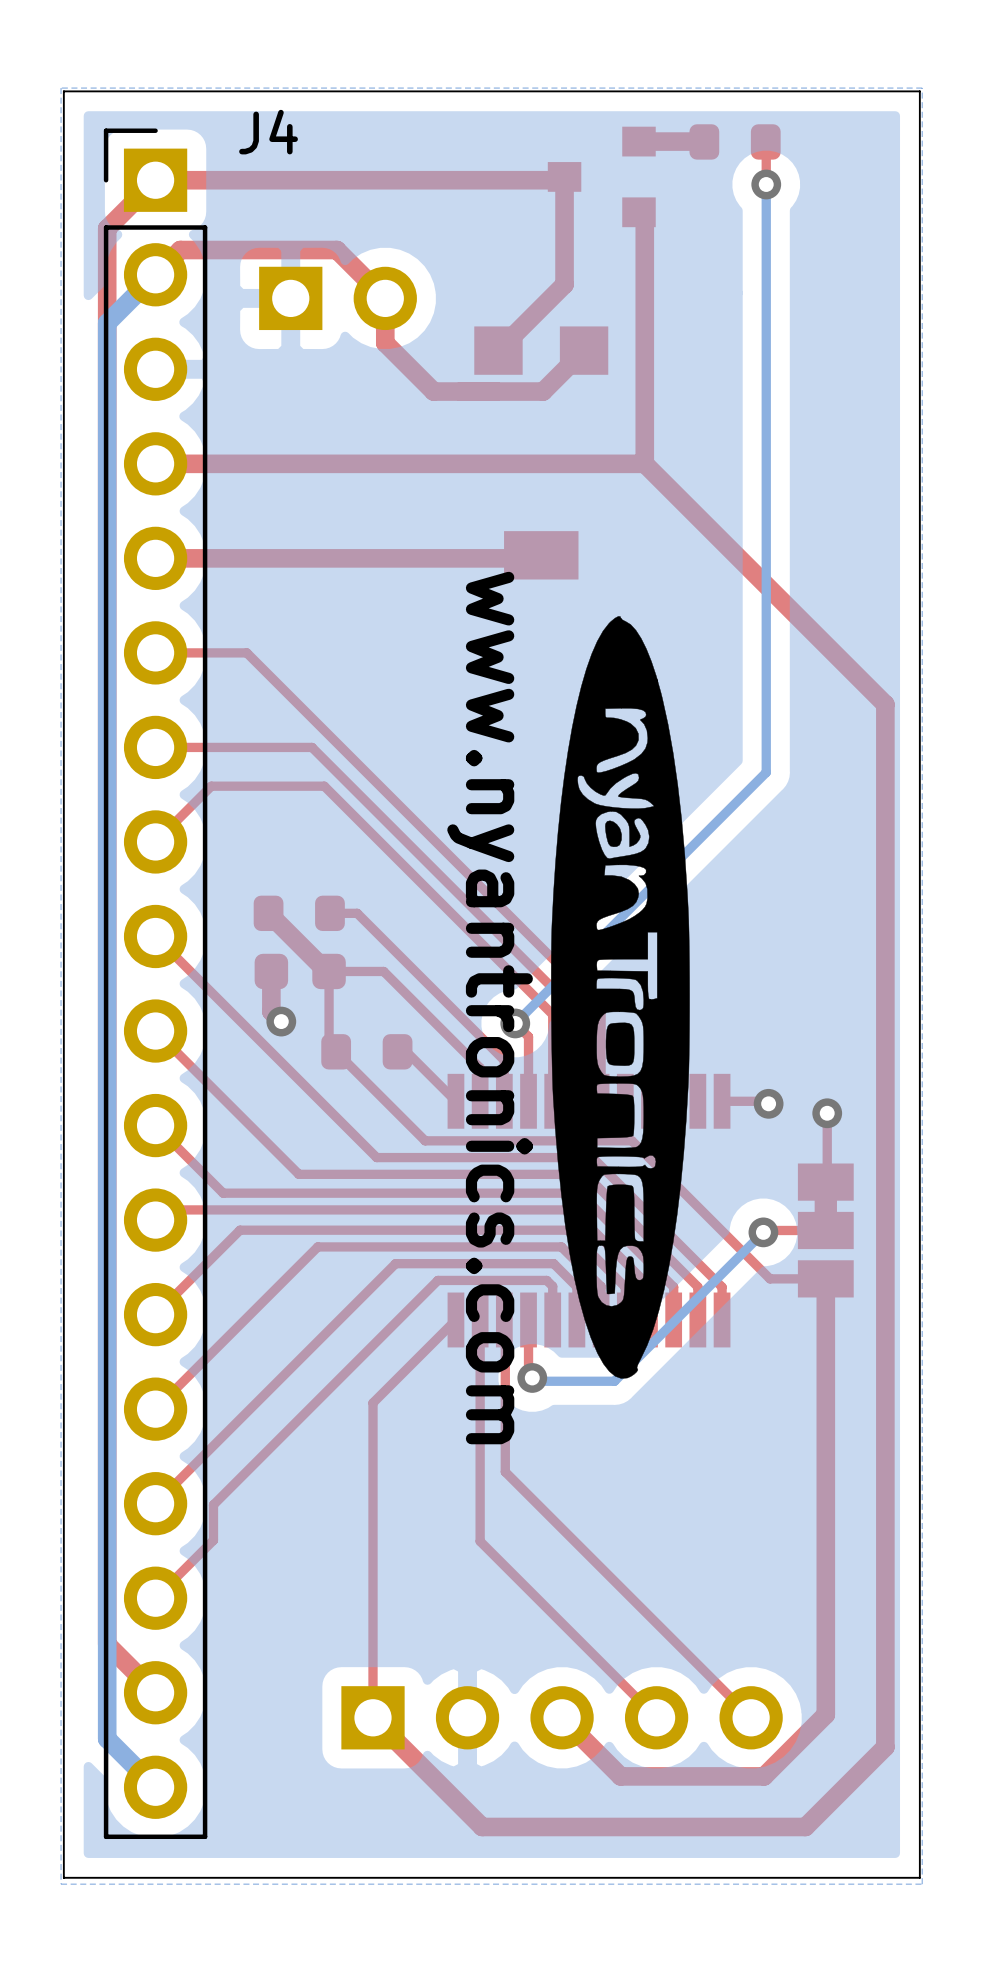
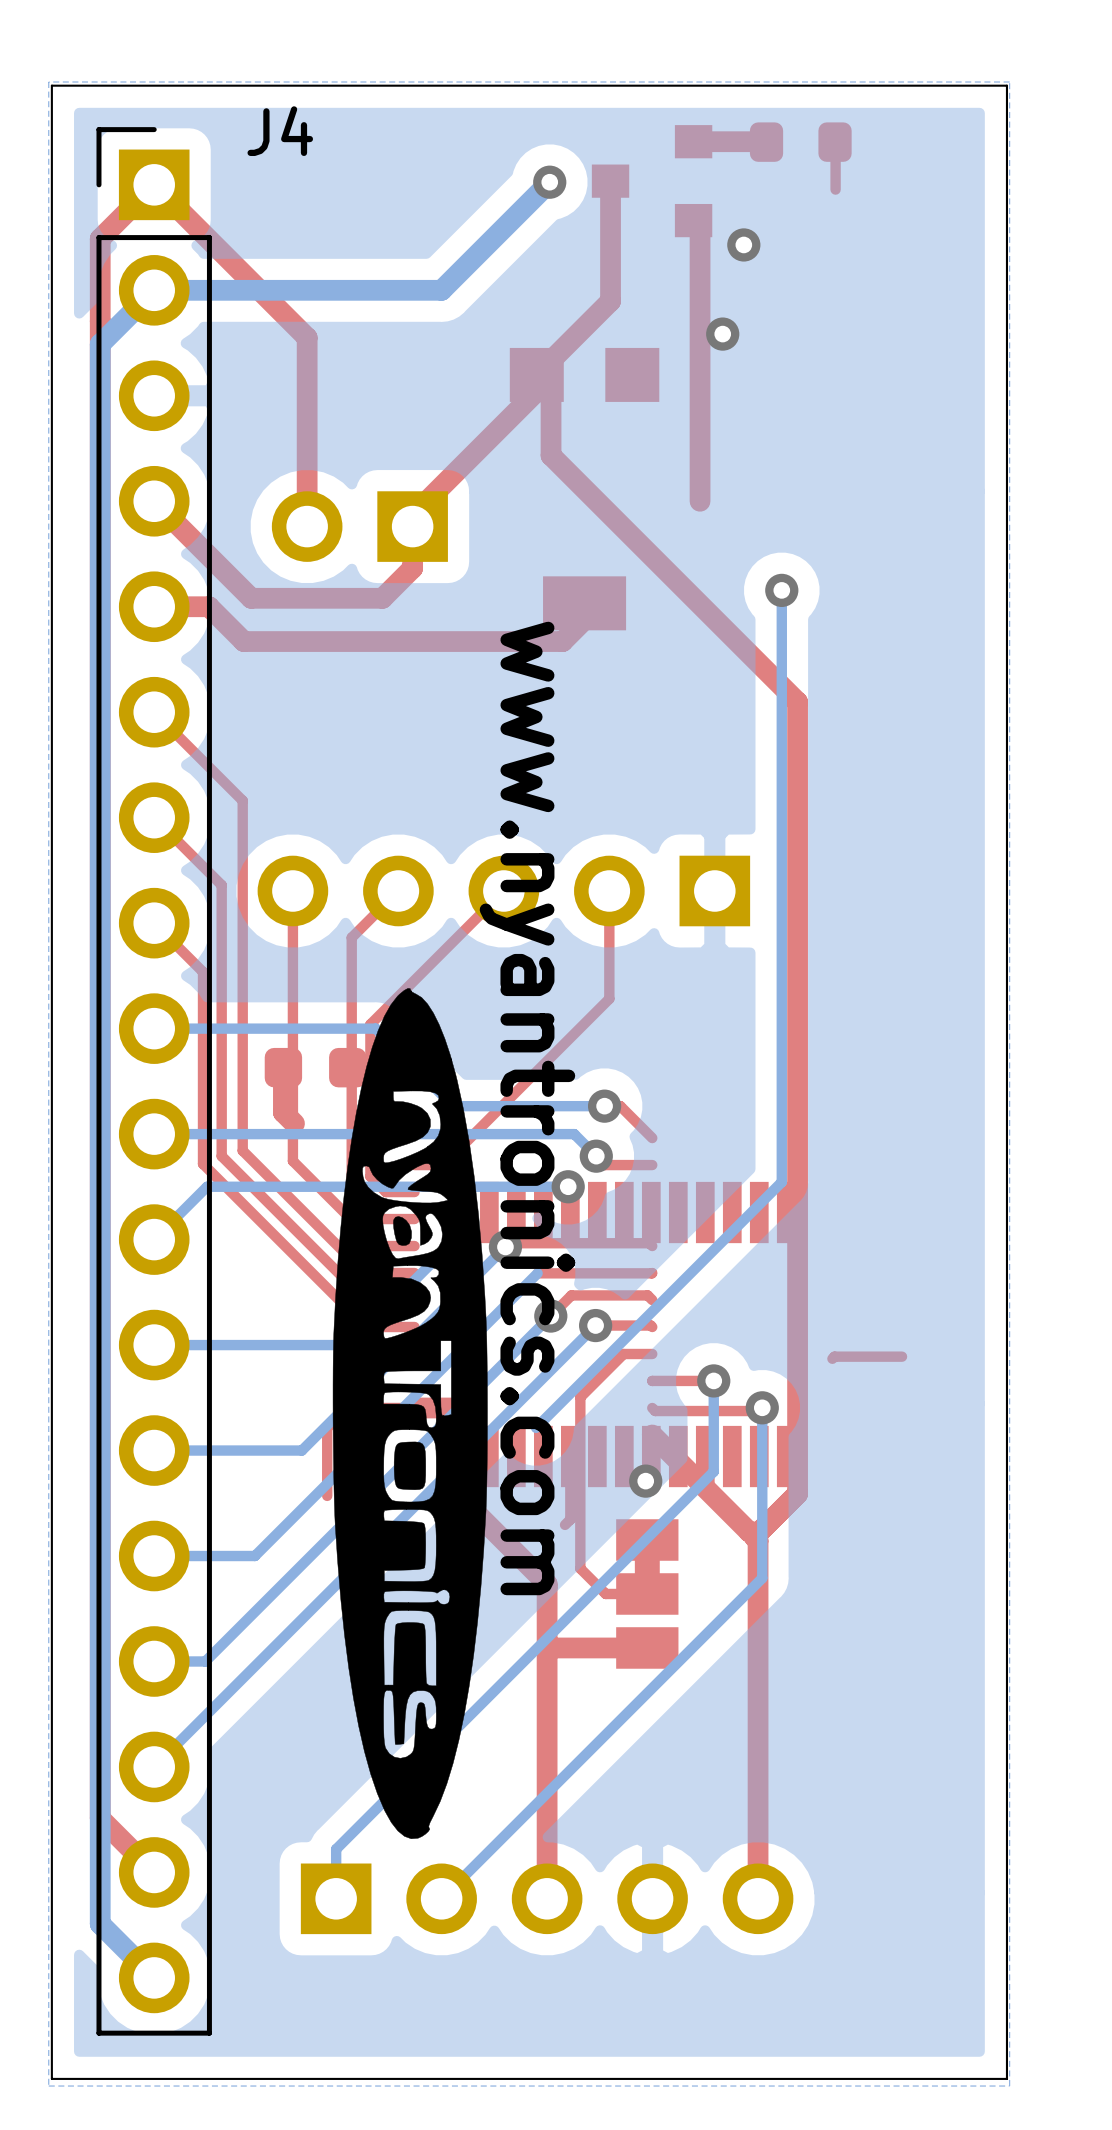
bottom track: none -> (549, 182) (441, 290) (154, 290)
via: none -> (549, 182)
top track: (563, 177) (561, 180) (155, 180) -> (307, 526) (307, 337) (154, 184)
bottom track: (766, 184) (766, 772) (515, 1023) -> none
via: (766, 184) -> none
via: none -> (743, 244)
top track: (155, 274) (180, 250) (336, 250) (385, 298) (385, 343) (433, 391) (543, 391) (584, 350) -> none
part rotation: 0° (338, 298) -> 180° (359, 526)
part position: (338, 298) -> (359, 526)
via: none -> (722, 334)
top track: (155, 463) (644, 463) (885, 704) (885, 1747) (805, 1826) (482, 1826) (373, 1717) (373, 1402) (455, 1319) -> (154, 501) (251, 598) (382, 598) (412, 568) (412, 515) (551, 377) (551, 455) (797, 702) (797, 1493) (754, 1537)
bottom track: none -> (781, 590) (781, 1182) (536, 1427)
via: none -> (781, 590)
top track: (541, 555) (538, 558) (204, 558) -> (598, 605) (562, 641) (243, 641) (209, 606)
top track: (155, 652) (246, 652) (601, 1007) (601, 1101) -> (154, 712) (242, 800) (242, 1150) (364, 1273) (414, 1273)
top track: (155, 747) (312, 747) (576, 1012) (576, 1101) -> (154, 817) (221, 885) (221, 1156) (365, 1300) (414, 1300)
top track: none -> (292, 890) (292, 1161) (377, 1246) (414, 1246)
top track: none -> (398, 890) (351, 937) (351, 1193) (377, 1219) (414, 1219)
top track: none -> (503, 890) (370, 1024) (370, 1176) (385, 1192) (414, 1192)
part: none -> (503, 890)
top track: none -> (609, 890) (609, 998) (443, 1165) (414, 1165)
top track: (155, 841) (211, 786) (324, 786) (552, 1014) (552, 1101) -> (154, 923) (203, 971) (203, 1163) (366, 1327) (414, 1327)
top track: (268, 913) (326, 971) (329, 971) -> none
part: (299, 913) -> none
top track: (329, 913) (357, 913) (504, 1060) (504, 1101) -> none
top track: (155, 936) (376, 1157) (592, 1157) (722, 1287) (722, 1319) -> none
bottom track: none -> (154, 1028) (375, 1028) (453, 1106) (604, 1106)
top track: (329, 971) (383, 971) (480, 1067) (480, 1101) -> none
top track: (329, 971) (329, 1044) (425, 1140) (631, 1140) (769, 1278) (825, 1278) (825, 1714) (764, 1776) (620, 1776) (562, 1717) -> none
drawing position: (620, 997) -> (410, 1413)
top track: none -> (604, 1106) (620, 1106) (652, 1138)
via: none -> (604, 1106)
via: (281, 1021) -> none
top track: (515, 1023) (528, 1036) (528, 1101) -> none
via: (515, 1023) -> none
top track: (155, 1031) (298, 1174) (585, 1174) (697, 1286) (697, 1319) -> none
bottom track: none -> (154, 1134) (574, 1134) (596, 1156)
top track: none -> (596, 1156) (605, 1165) (652, 1165)
via: none -> (596, 1156)
part: (366, 1051) -> none
top track: (397, 1051) (406, 1051) (455, 1101) -> none
bottom track: none -> (568, 1186) (207, 1186) (154, 1239)
via: none -> (568, 1186)
top track: (722, 1101) (766, 1101) (768, 1103) -> none
via: (768, 1103) -> none
bottom track: none -> (470, 1223) (349, 1345) (154, 1345)
top track: (827, 1113) (825, 1182) -> none
via: (827, 1113) -> none
top track: (155, 1125) (223, 1193) (579, 1193) (673, 1287) (673, 1319) -> none
top track: none -> (652, 1246) (649, 1243) (509, 1243) (505, 1246)
bottom track: none -> (505, 1246) (301, 1450) (154, 1450)
via: none -> (505, 1246)
bottom track: none -> (537, 1273) (254, 1556) (154, 1556)
top track: none -> (651, 1273) (537, 1273)
top track: none -> (652, 1300) (647, 1295) (571, 1295) (550, 1316)
bottom track: none -> (550, 1316) (205, 1661) (154, 1661)
via: none -> (550, 1316)
top track: none -> (595, 1325) (652, 1327)
bottom track: none -> (595, 1325) (154, 1766)
via: none -> (595, 1325)
top track: (155, 1220) (165, 1209) (572, 1209) (649, 1286) (649, 1319) -> none
top track: none -> (652, 1354) (623, 1354) (580, 1397) (580, 1568) (605, 1593) (647, 1593)
part position: (825, 1230) -> (647, 1593)
bottom track: (763, 1232) (614, 1381) (523, 1381) -> none
via: (763, 1232) -> none
top track: none -> (713, 1380) (652, 1380)
bottom track: none -> (713, 1380) (713, 1471) (336, 1849) (336, 1898)
via: none -> (713, 1380)
top track: none -> (762, 1407) (759, 1411) (655, 1411) (652, 1407)
bottom track: none -> (762, 1407) (762, 1578) (441, 1898)
via: none -> (762, 1407)
top track: (155, 1314) (240, 1230) (568, 1230) (625, 1287) (625, 1319) -> none
top track: (480, 1319) (480, 1541) (656, 1717) -> none
top track: (504, 1319) (505, 1471) (751, 1717) -> none
top track: (552, 1319) (552, 1286) (546, 1280) (437, 1280) (213, 1504) (213, 1540) (155, 1598) -> none
top track: (576, 1319) (576, 1286) (553, 1263) (395, 1263) (155, 1503) -> none
top track: (601, 1319) (601, 1286) (561, 1246) (317, 1246) (155, 1409) -> none
top track: none -> (327, 1495) (327, 1427) (347, 1407) (455, 1407) (463, 1416) (463, 1488) (457, 1494) (547, 1583) (547, 1898)
via position: (532, 1377) -> (645, 1481)
top track: none -> (754, 1537) (759, 1532) (749, 1532) (652, 1434) (754, 1537)
top track: none -> (754, 1537) (758, 1540) (758, 1898)
top track: none -> (647, 1647) (550, 1647) (547, 1650)
part position: (562, 1717) -> (547, 1898)

